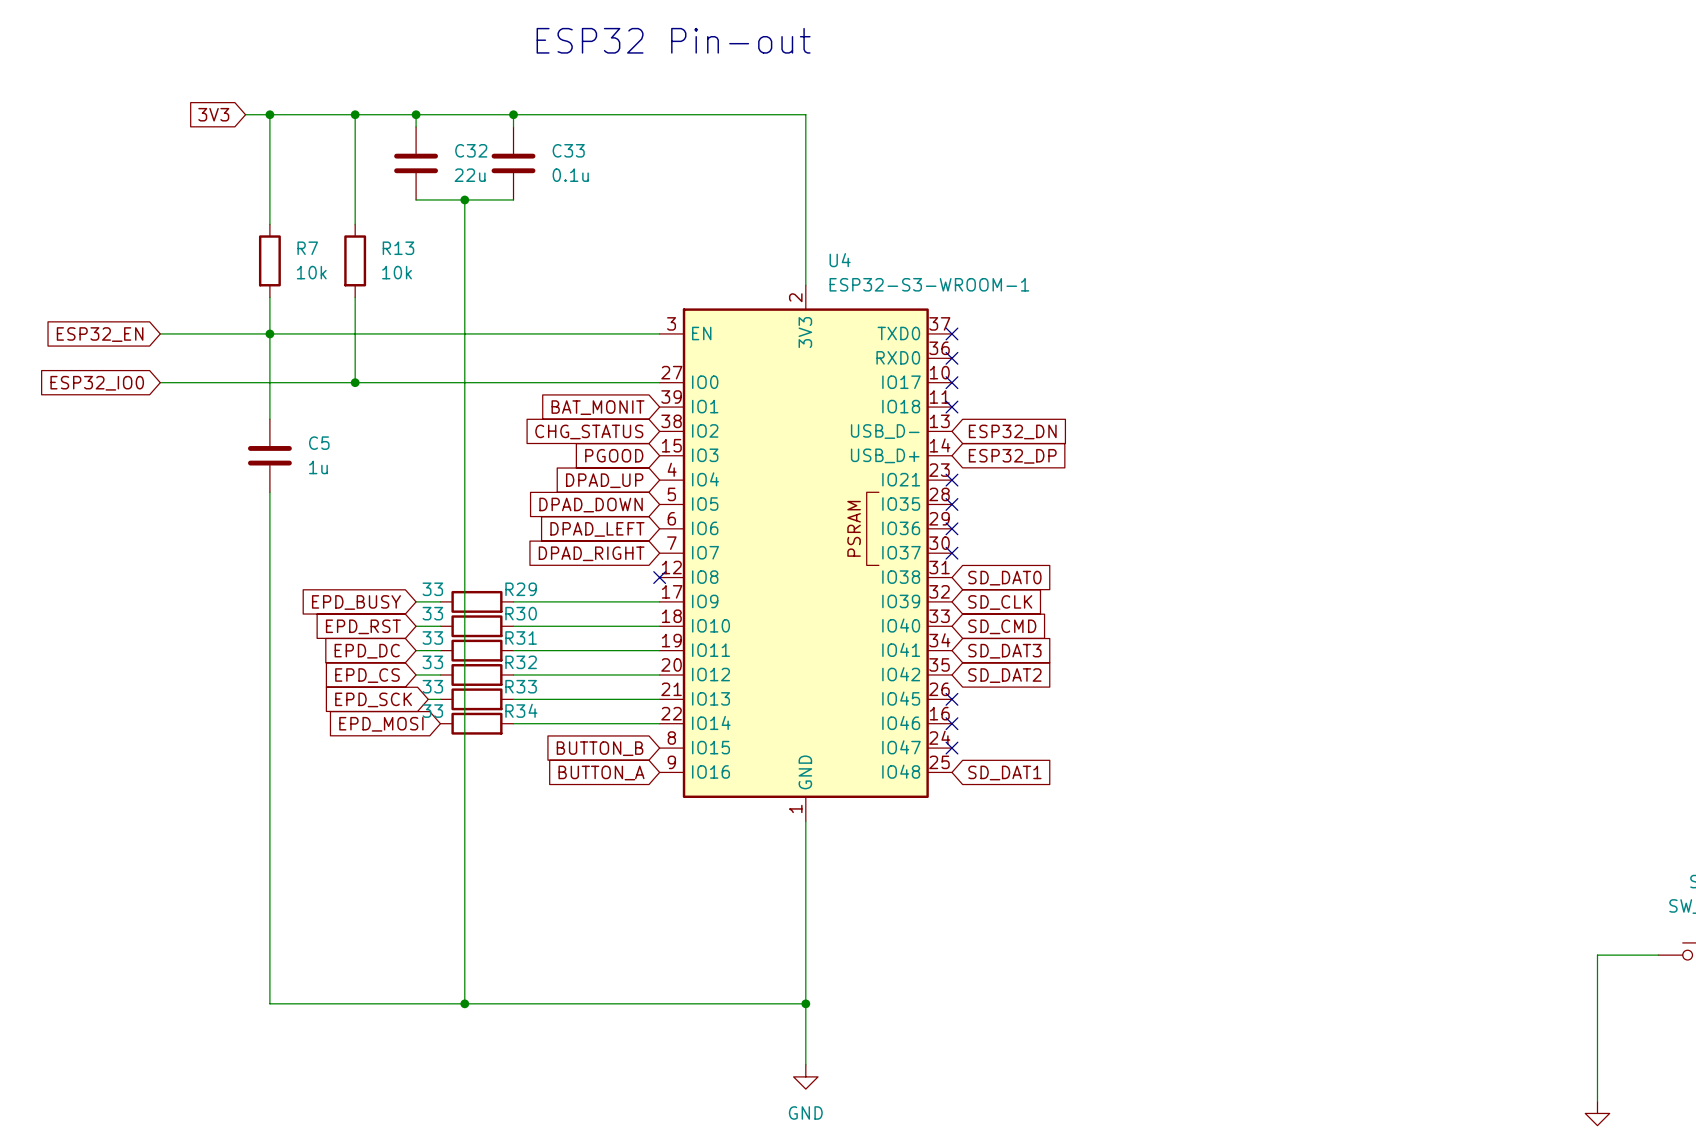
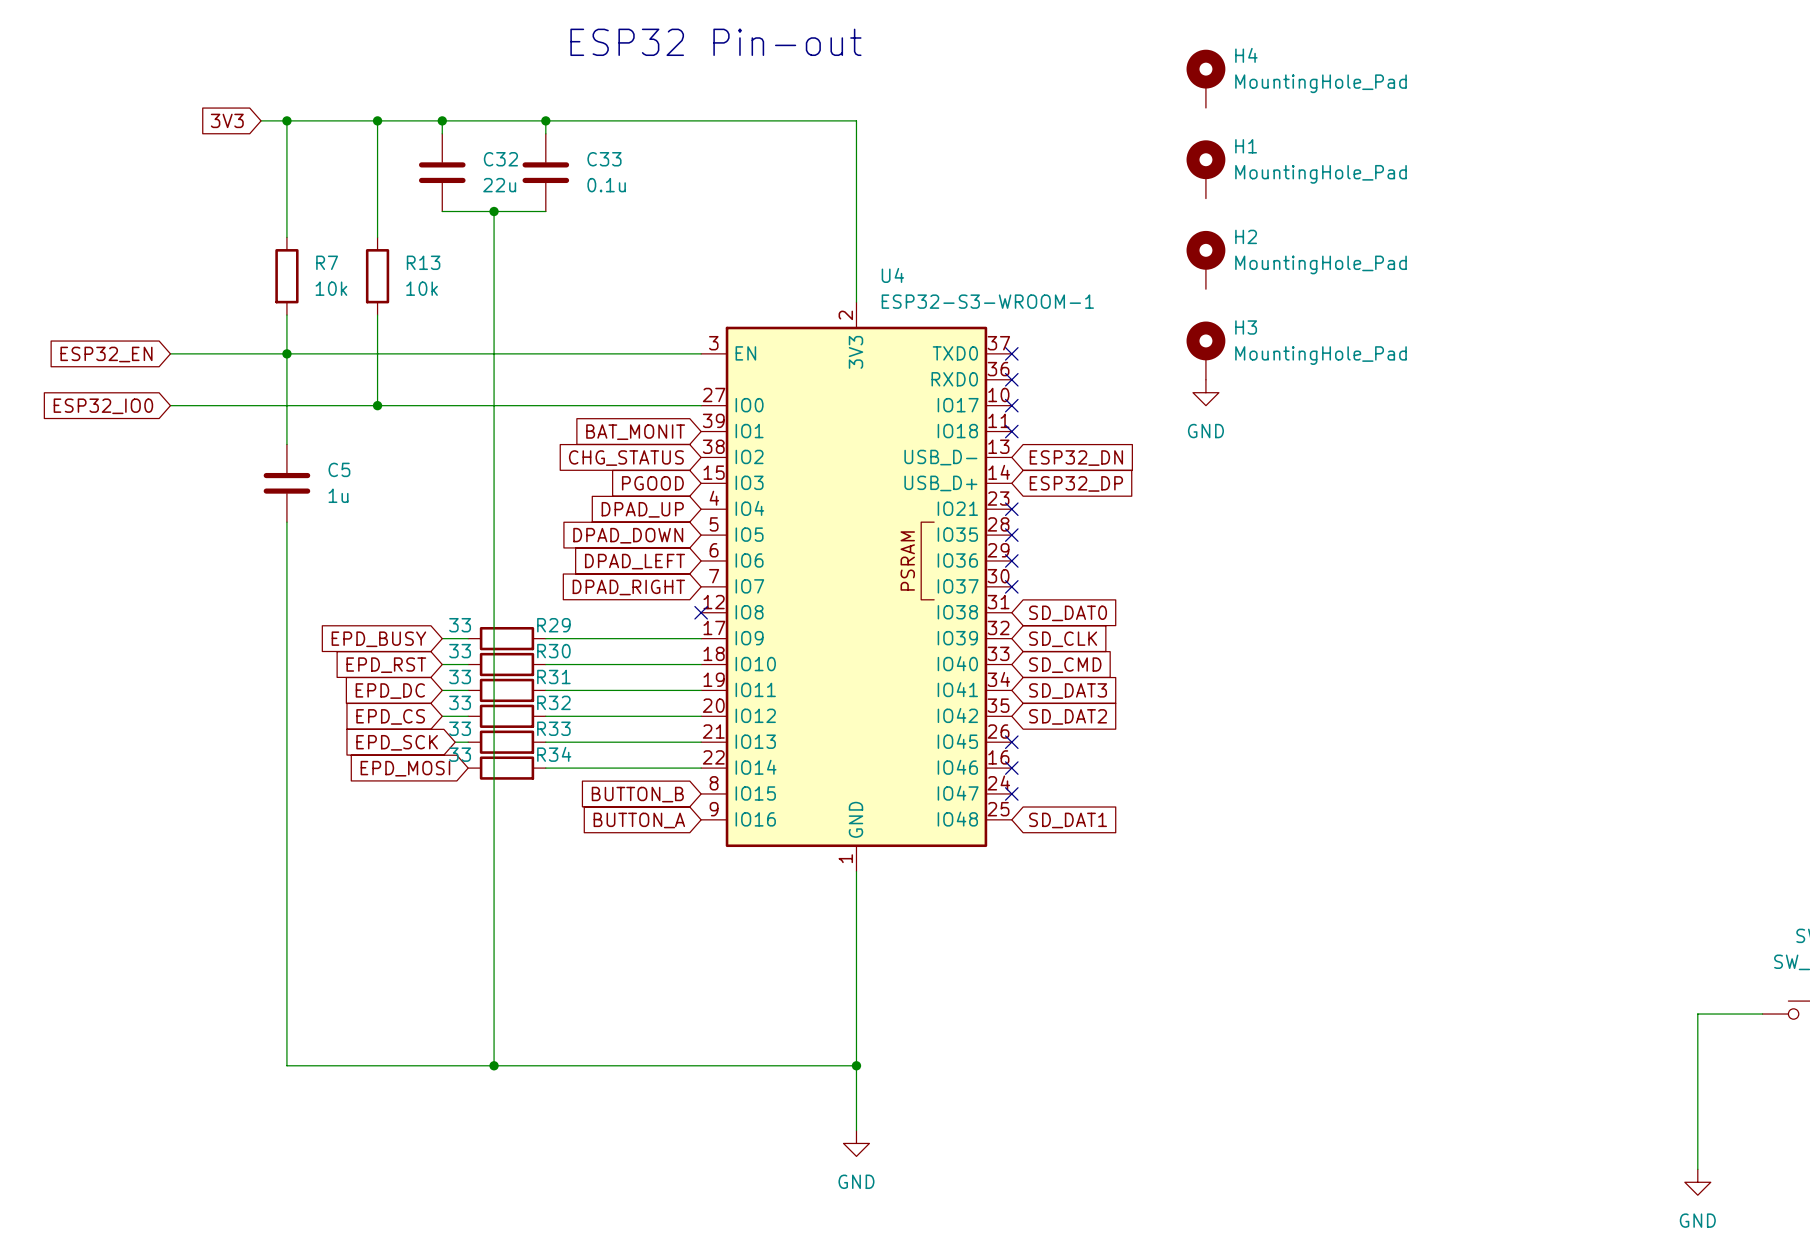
H4: none -> MountingHole_Pad (1205, 78)
H1: none -> MountingHole_Pad (1205, 169)
H2: none -> MountingHole_Pad (1205, 260)
H3: none -> MountingHole_Pad (1205, 350)
power symbol: none -> GND (1205, 392)

